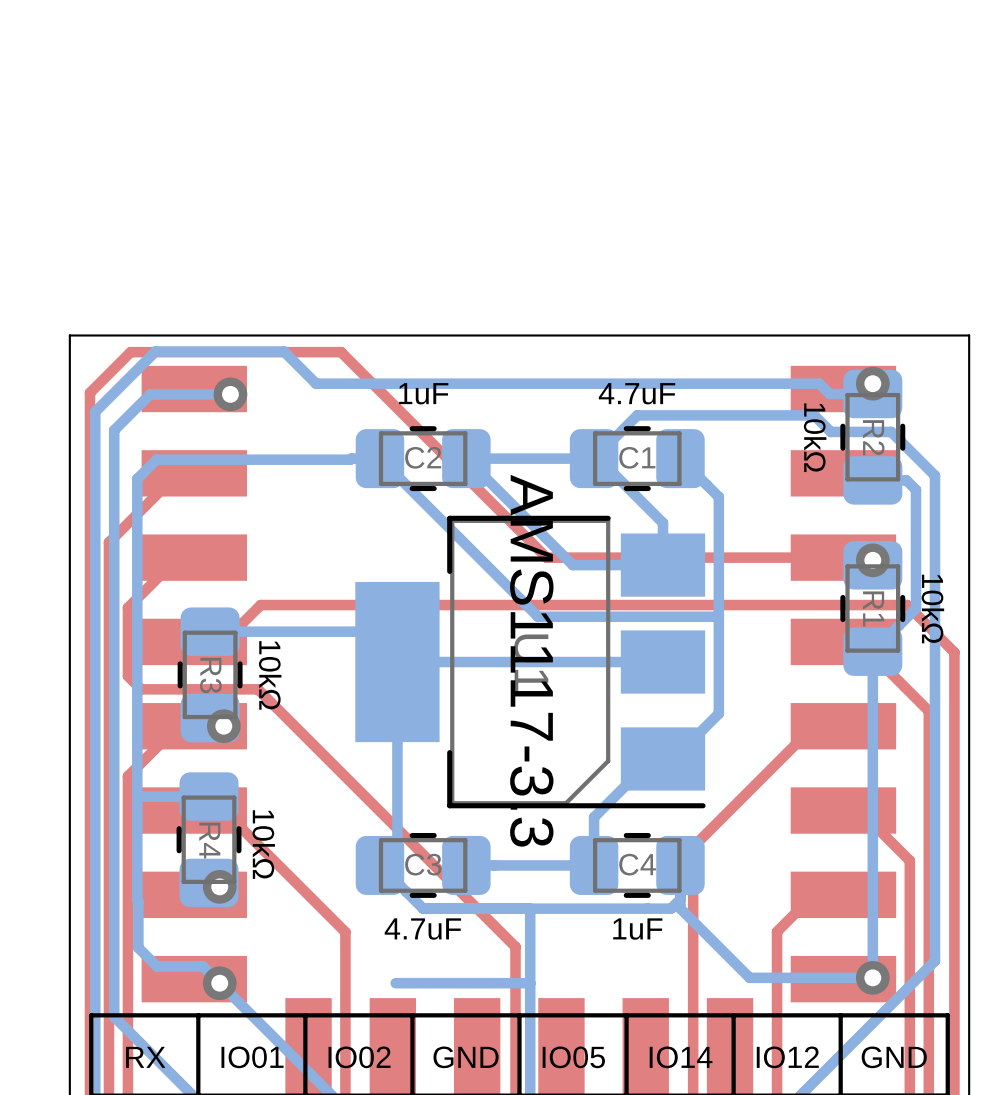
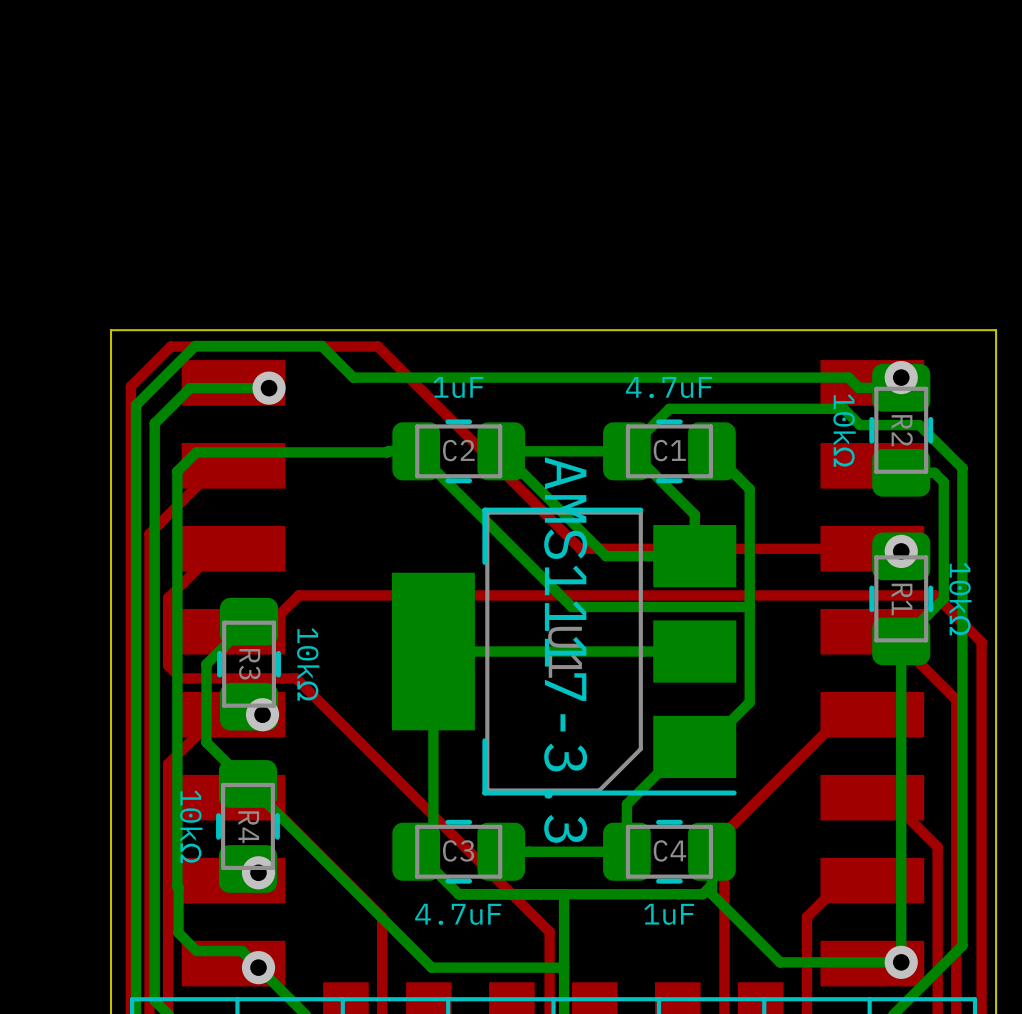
bottom track: (210, 631) (367, 631) (397, 662) -> (249, 621) (206, 664) (206, 742) (431, 967)
bottom track: (137, 793) (140, 796) (209, 796) -> none
R4 value position: 10kΩ (263, 844) -> 10kΩ (191, 826)

